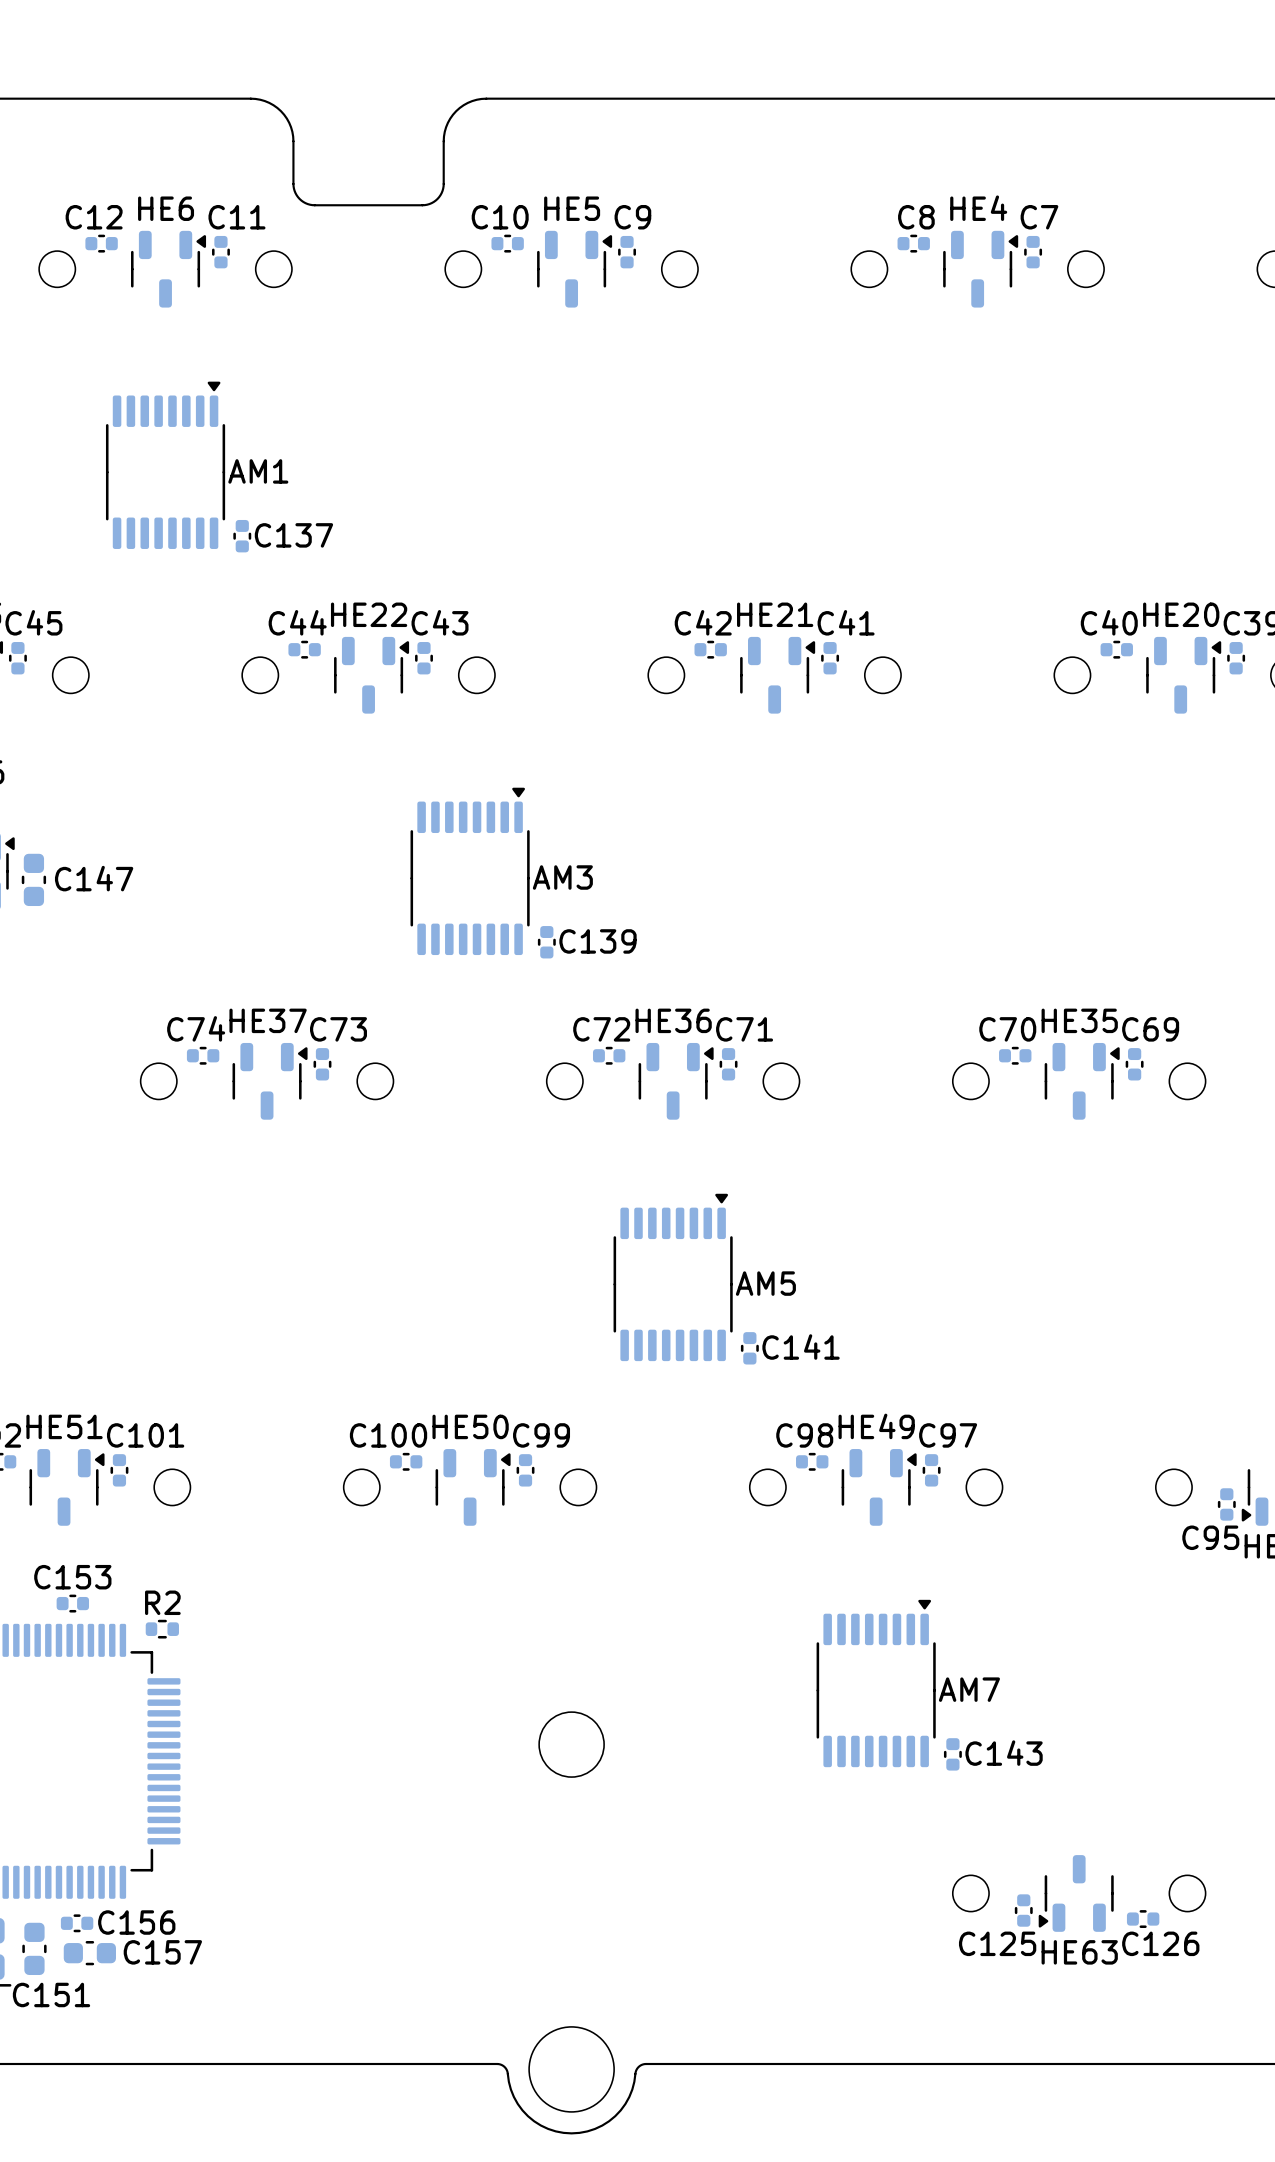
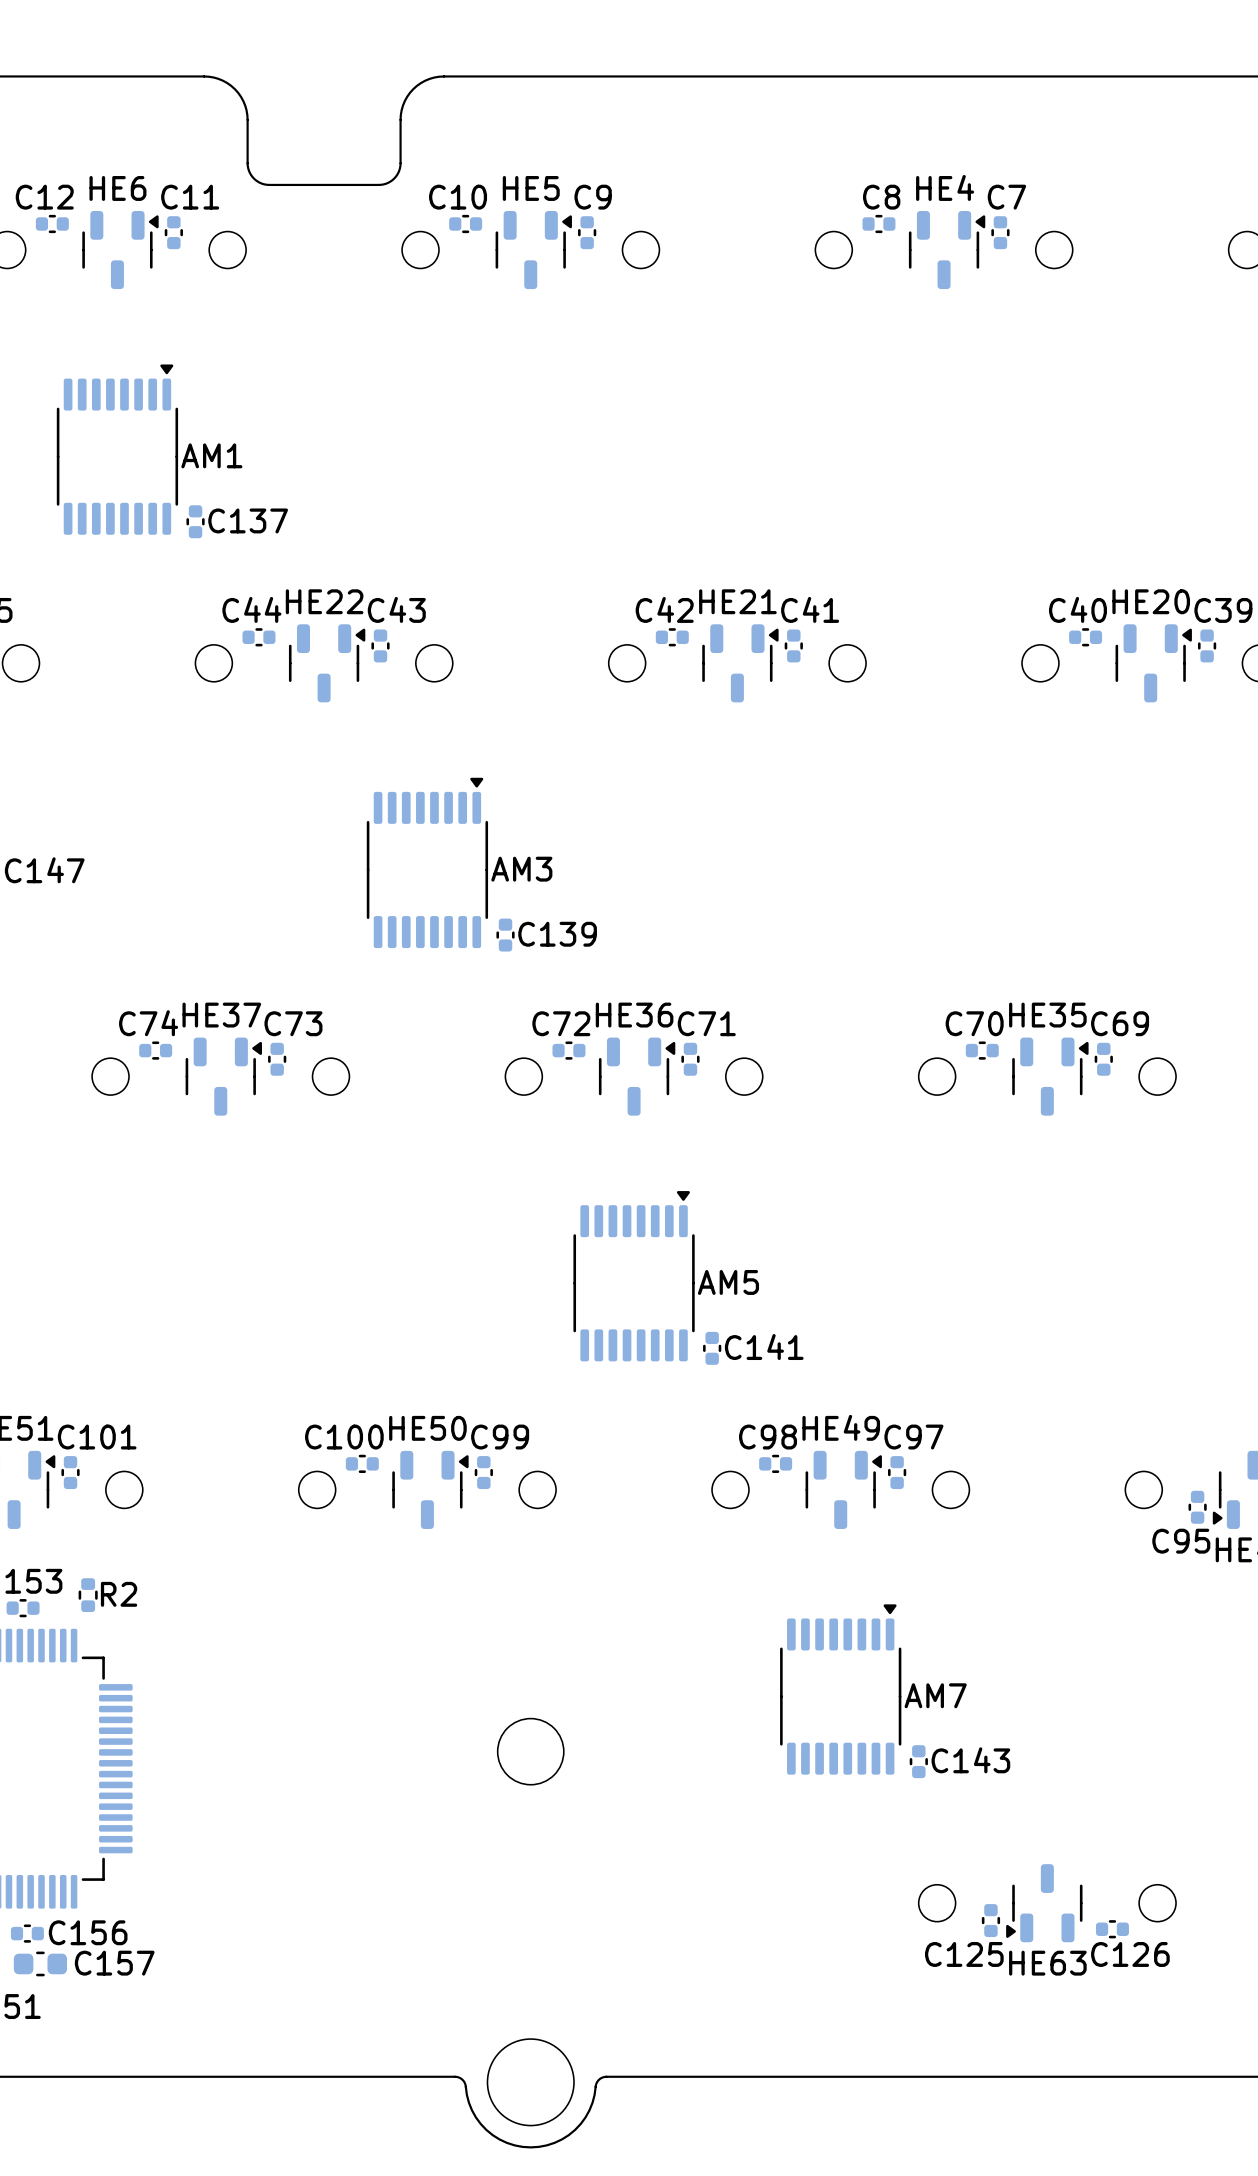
R2 rotation: 0° (162, 1629) -> 90° clockwise (88, 1595)
R2 position: (162, 1629) -> (88, 1595)

